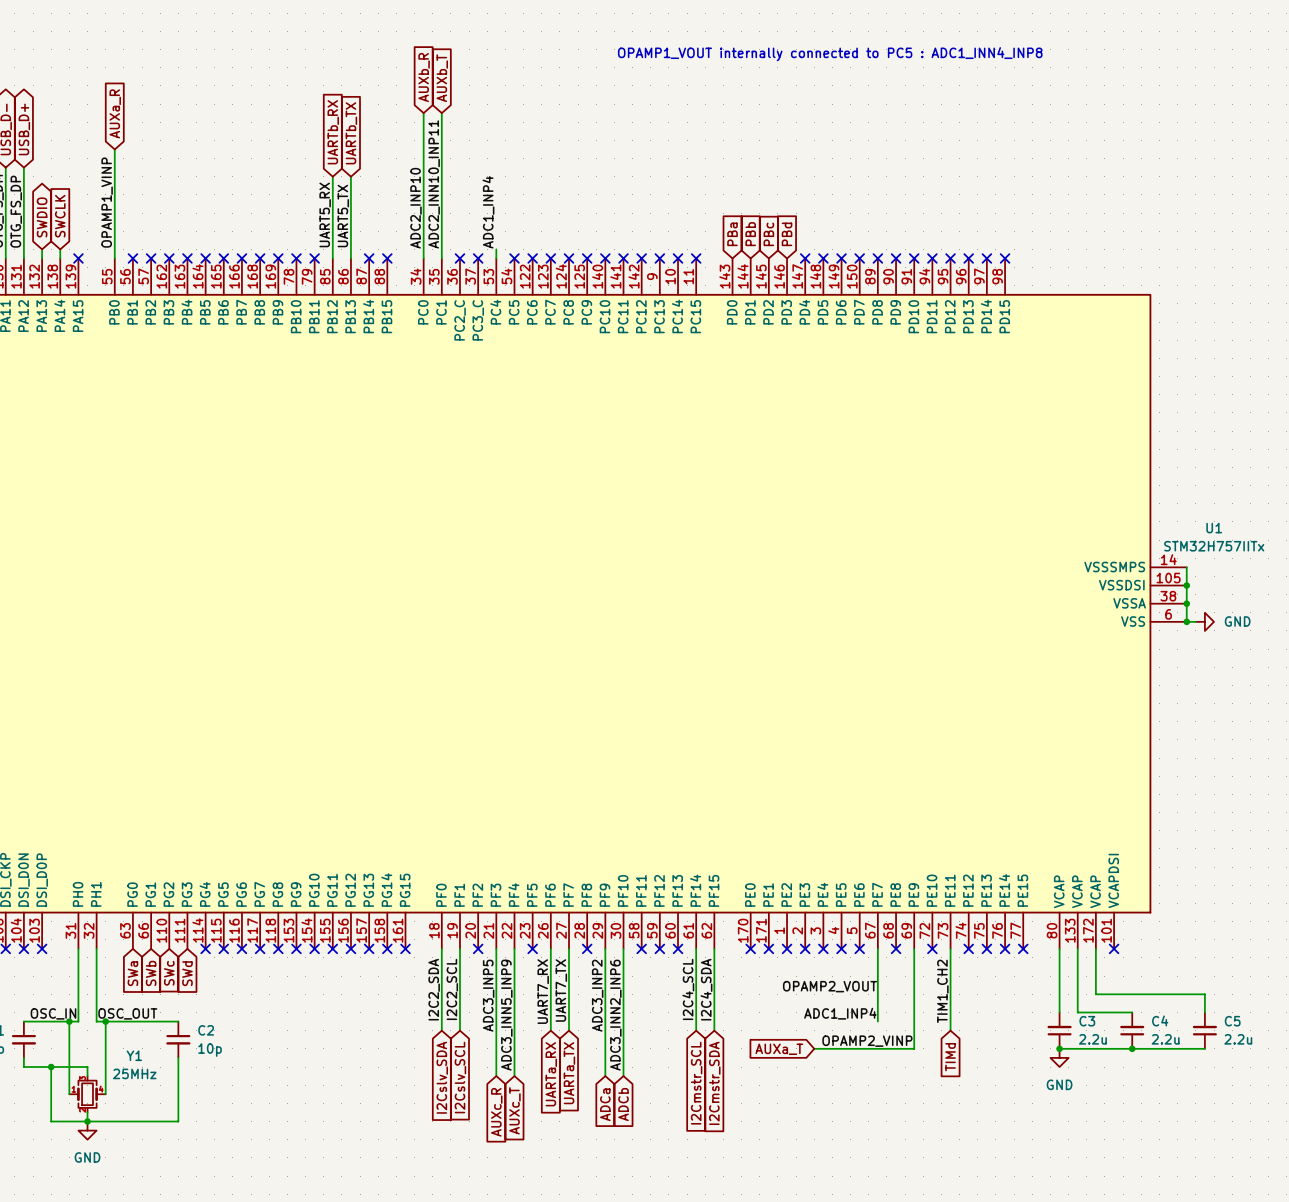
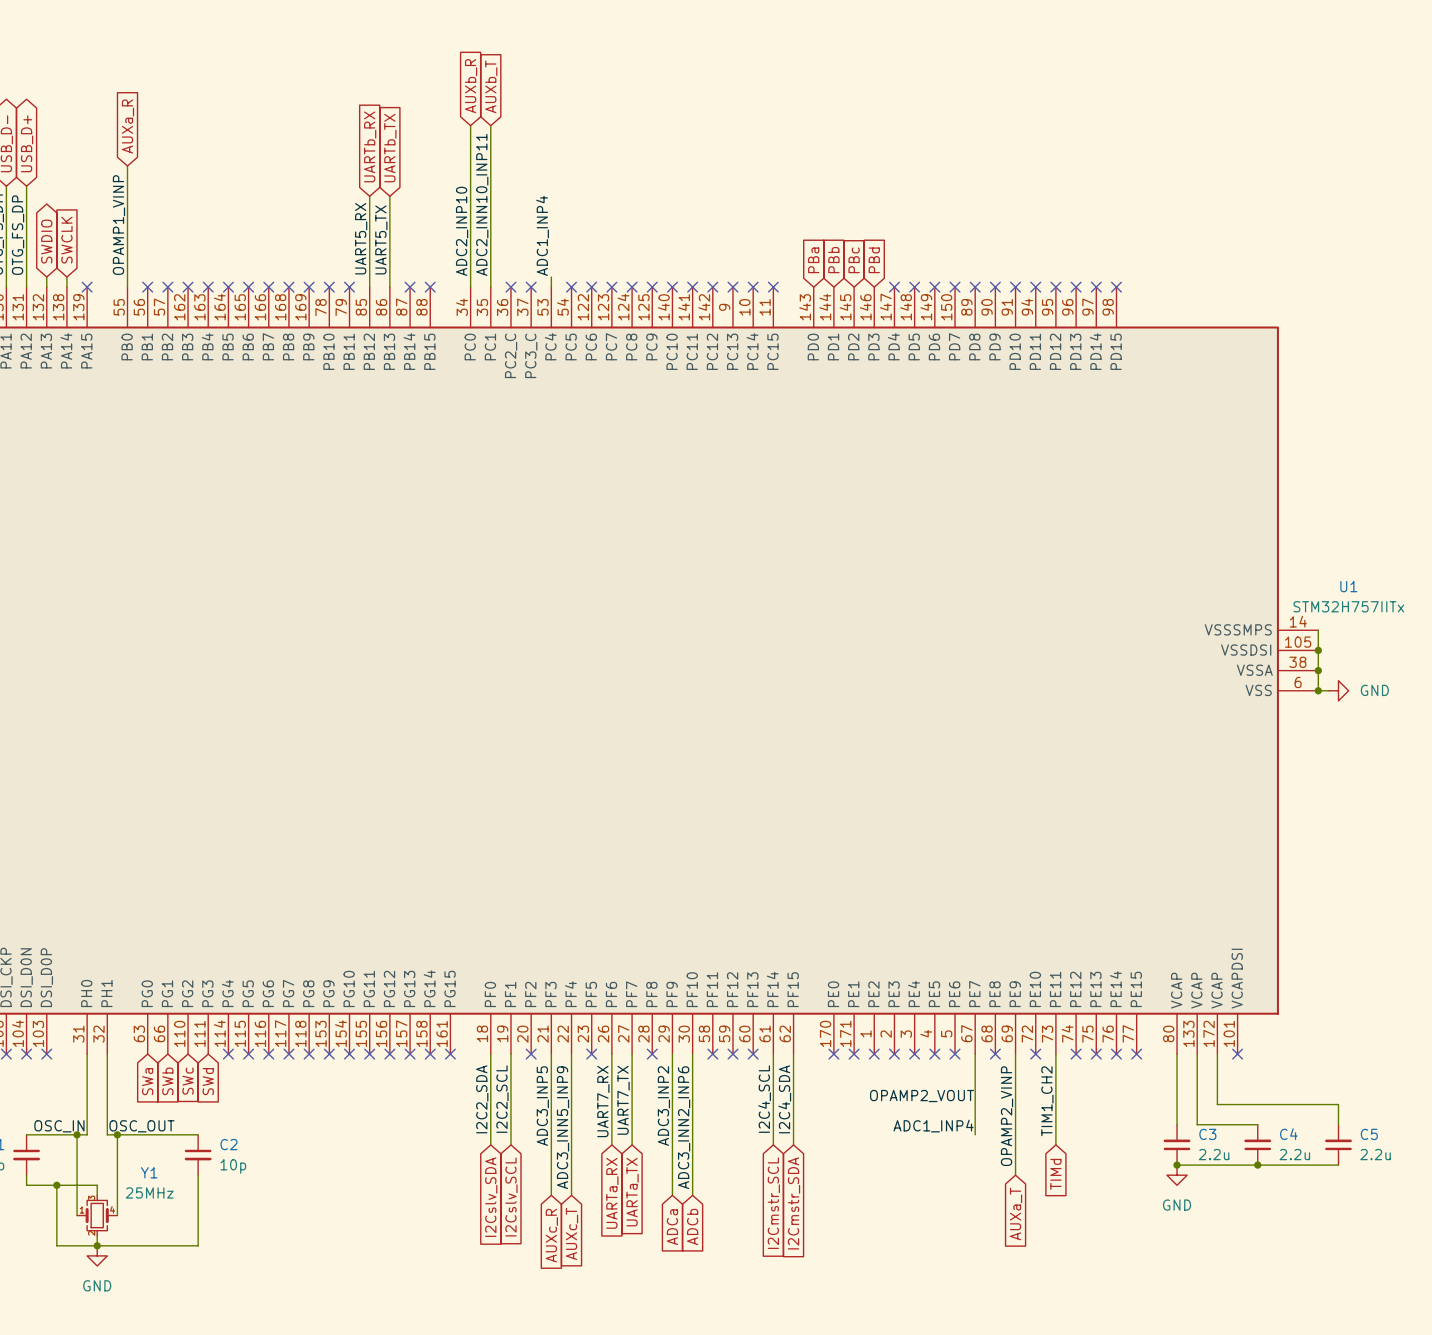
text: OPAMP1_VOUT internally connected to PC5 : ADC1_INN4_INP8 (830, 54) -> none
label rotation: 0° (867, 1041) -> 90° counterclockwise (1007, 1116)
wire: (814, 1048) (914, 1048) -> (1015, 1175) (1015, 1165)
global label rotation: 0° (779, 1049) -> 90° counterclockwise (1016, 1214)
global label position: AUXa_T (779, 1049) -> AUXa_T (1016, 1214)

